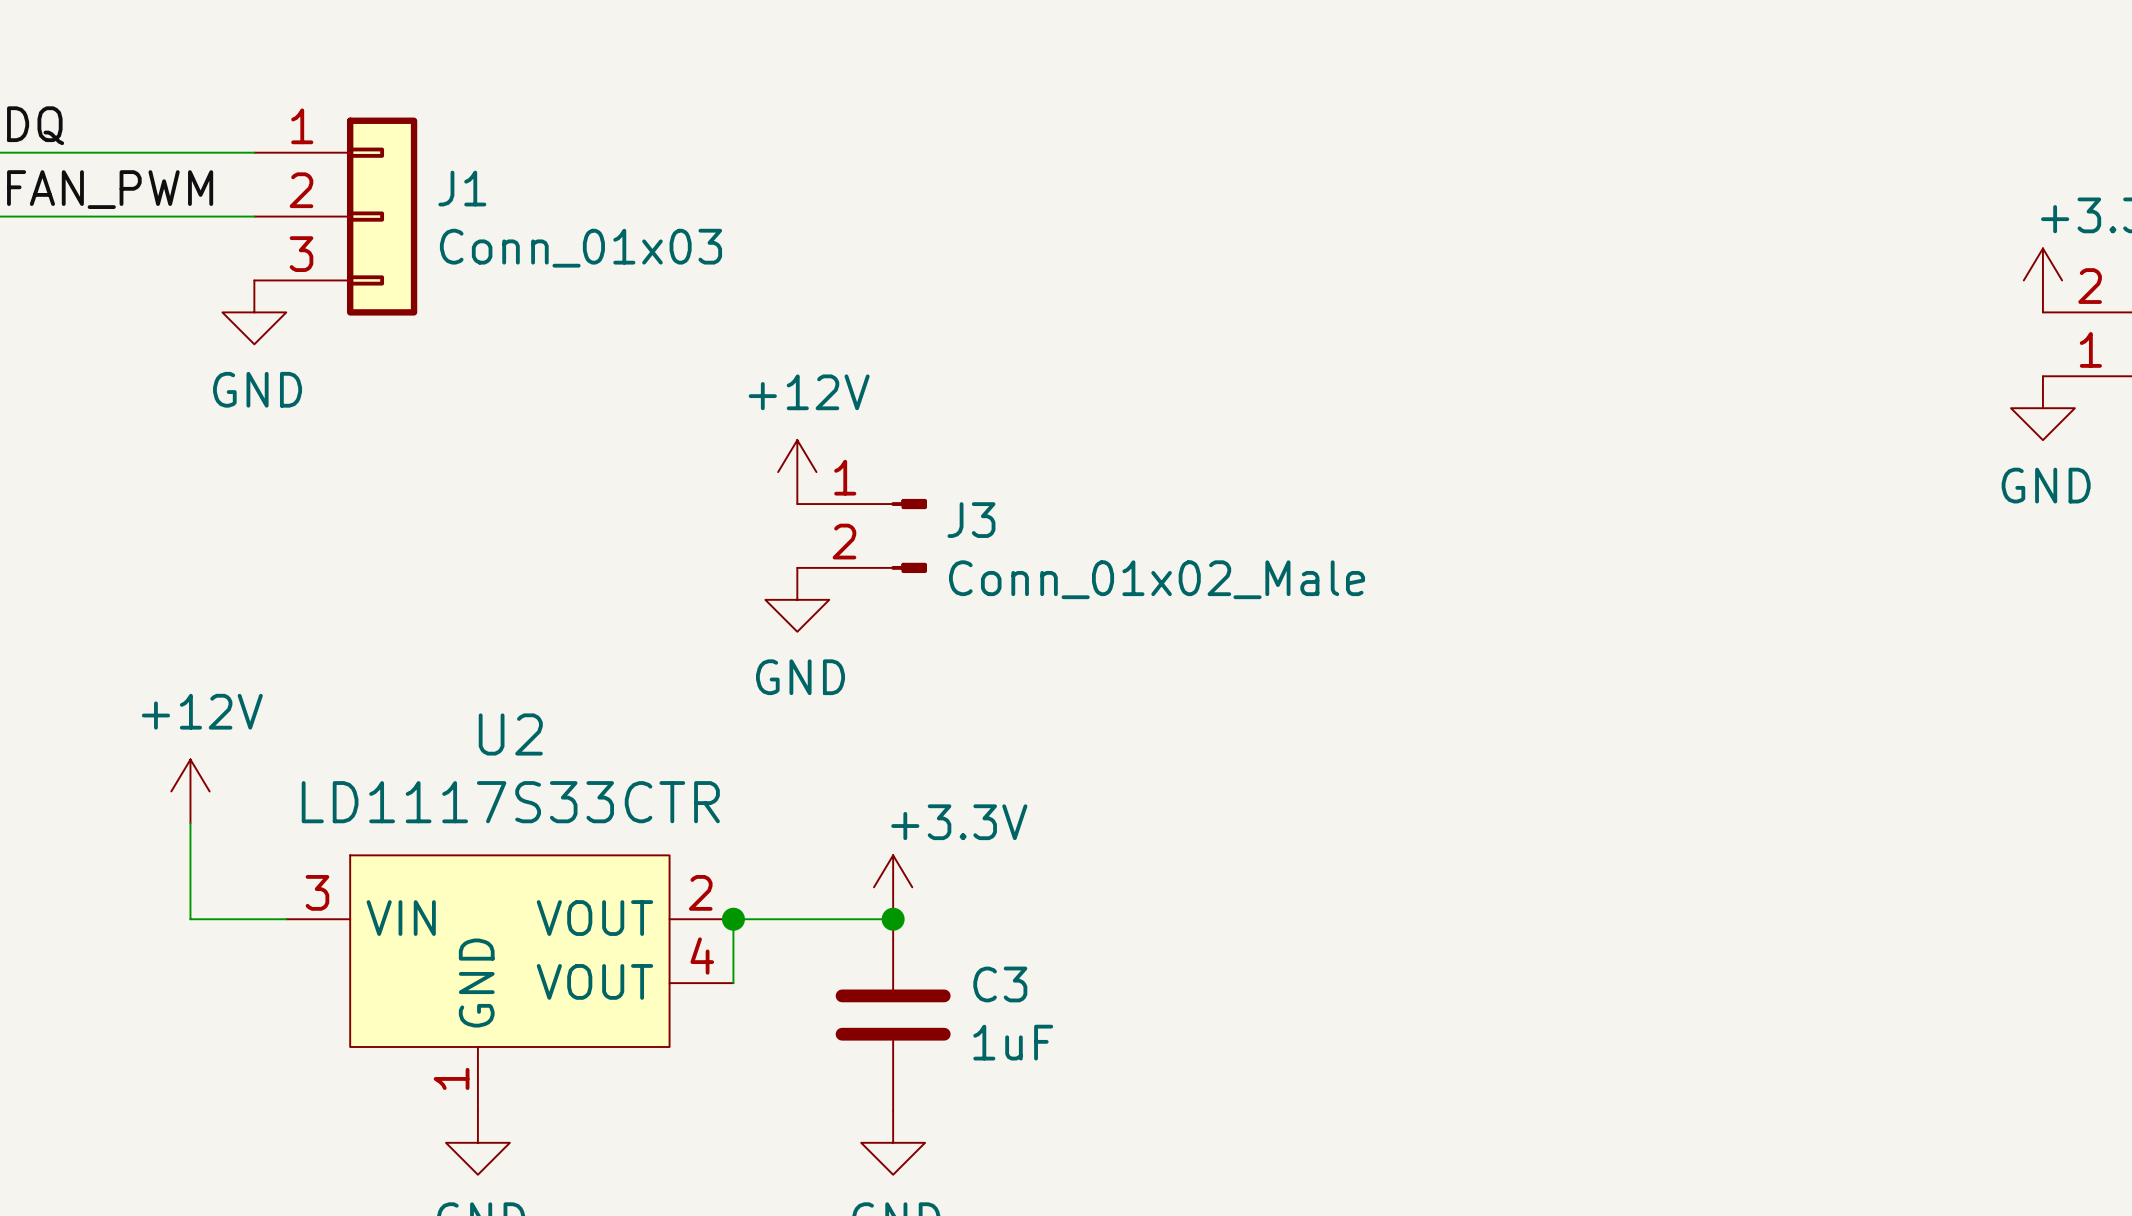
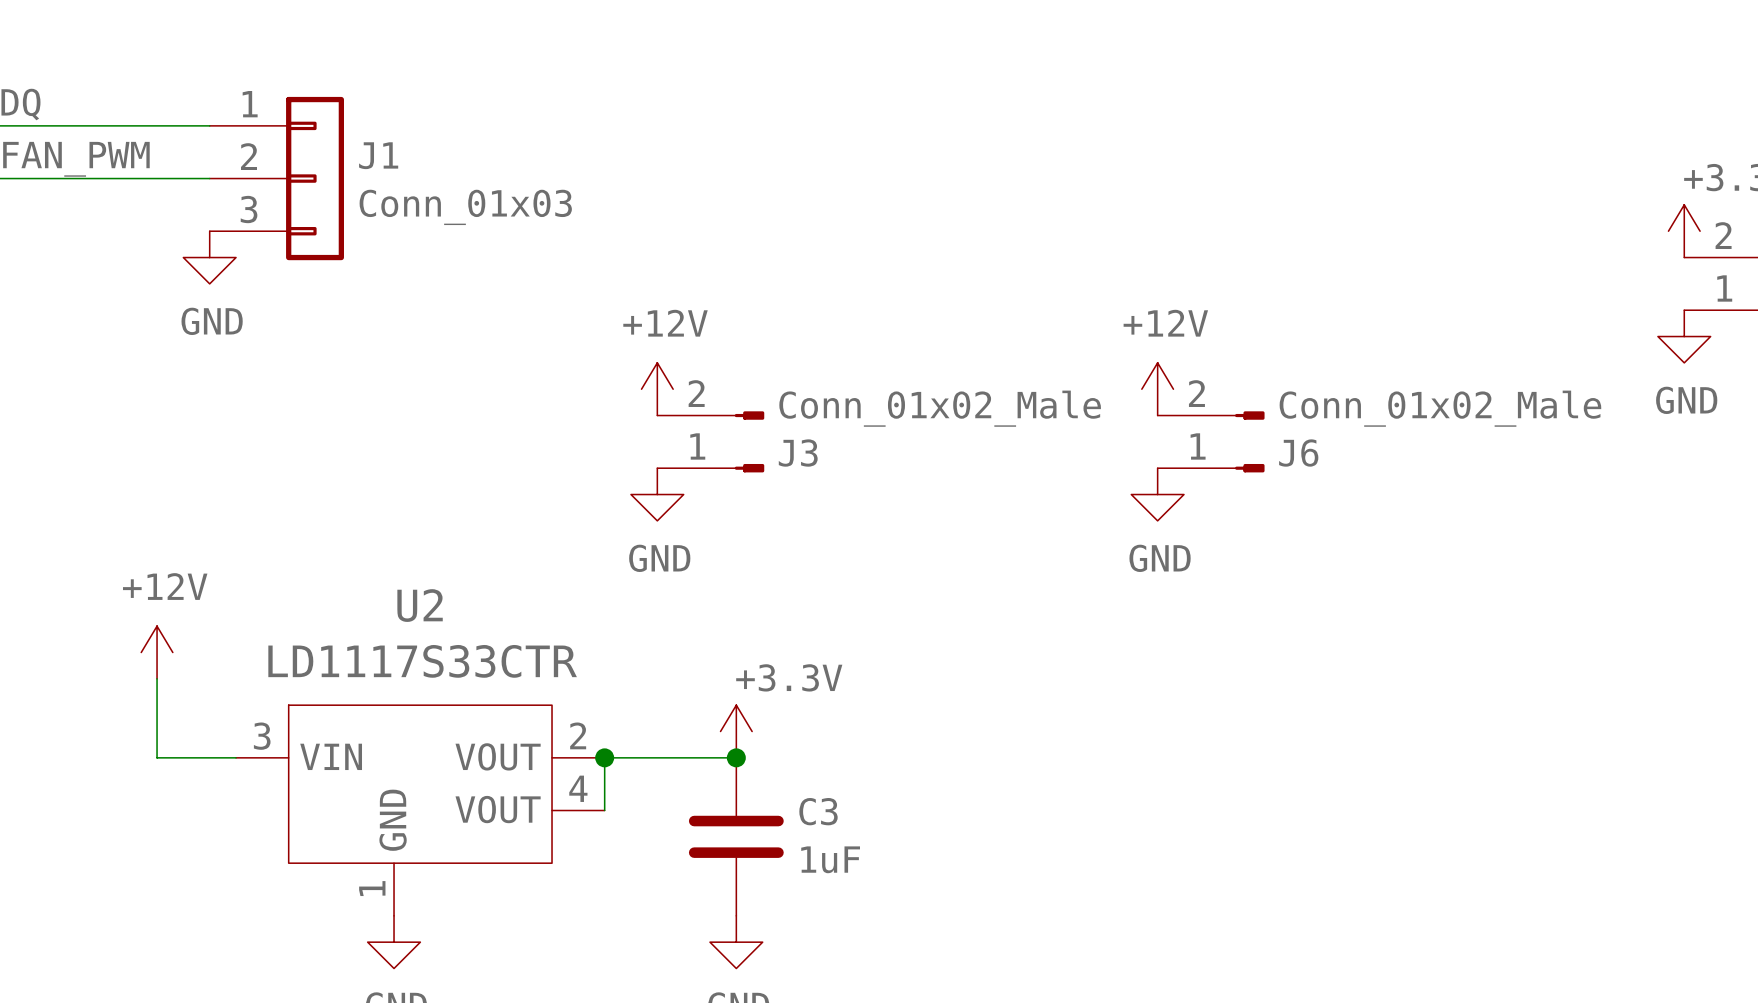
power symbol: none -> +12V (1157, 389)
J3 flip: as is (909, 535) -> up-down (749, 441)
J6: none -> Conn_01x02_Male (1211, 441)
power symbol: none -> GND (1157, 494)

